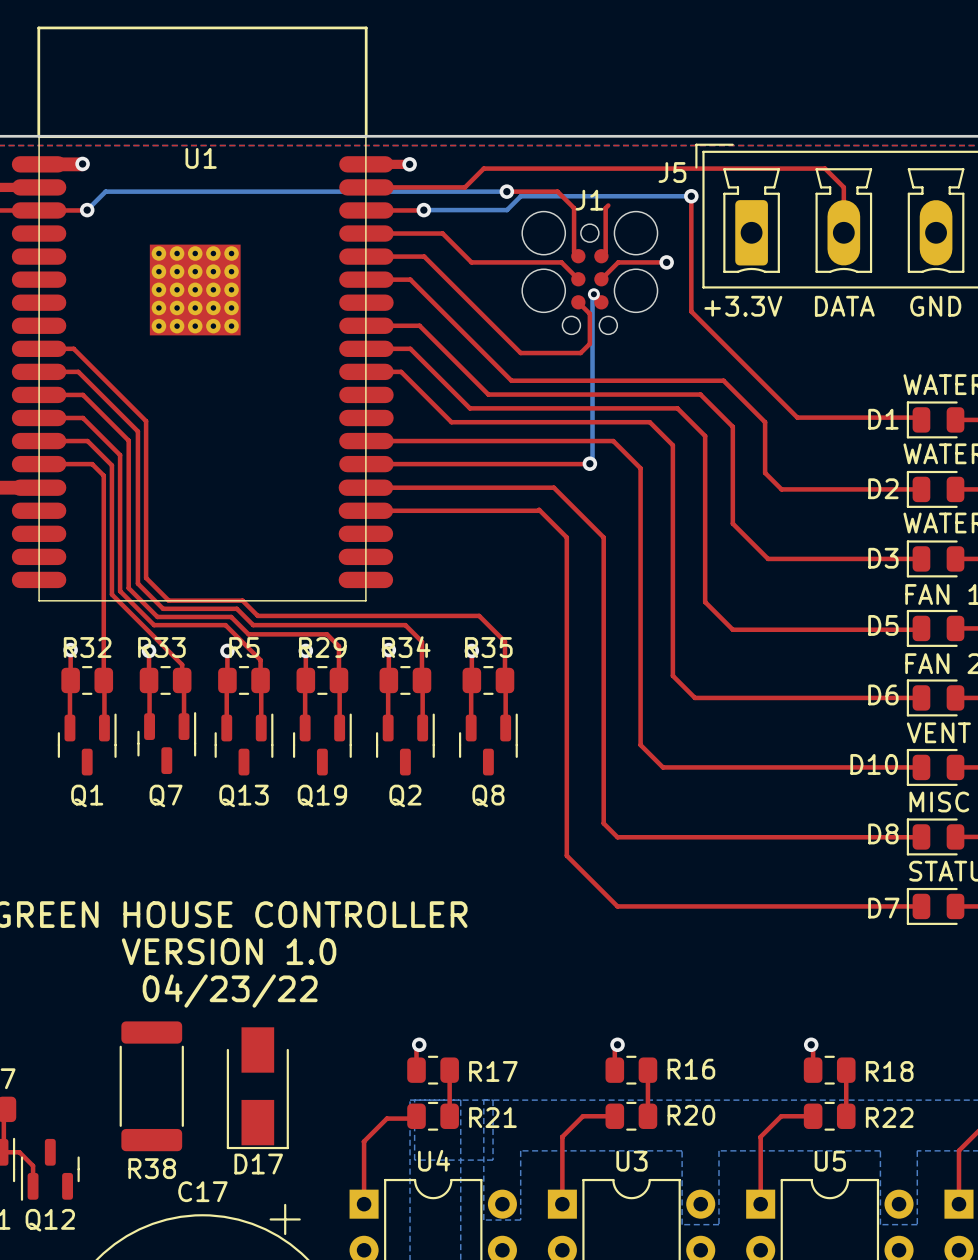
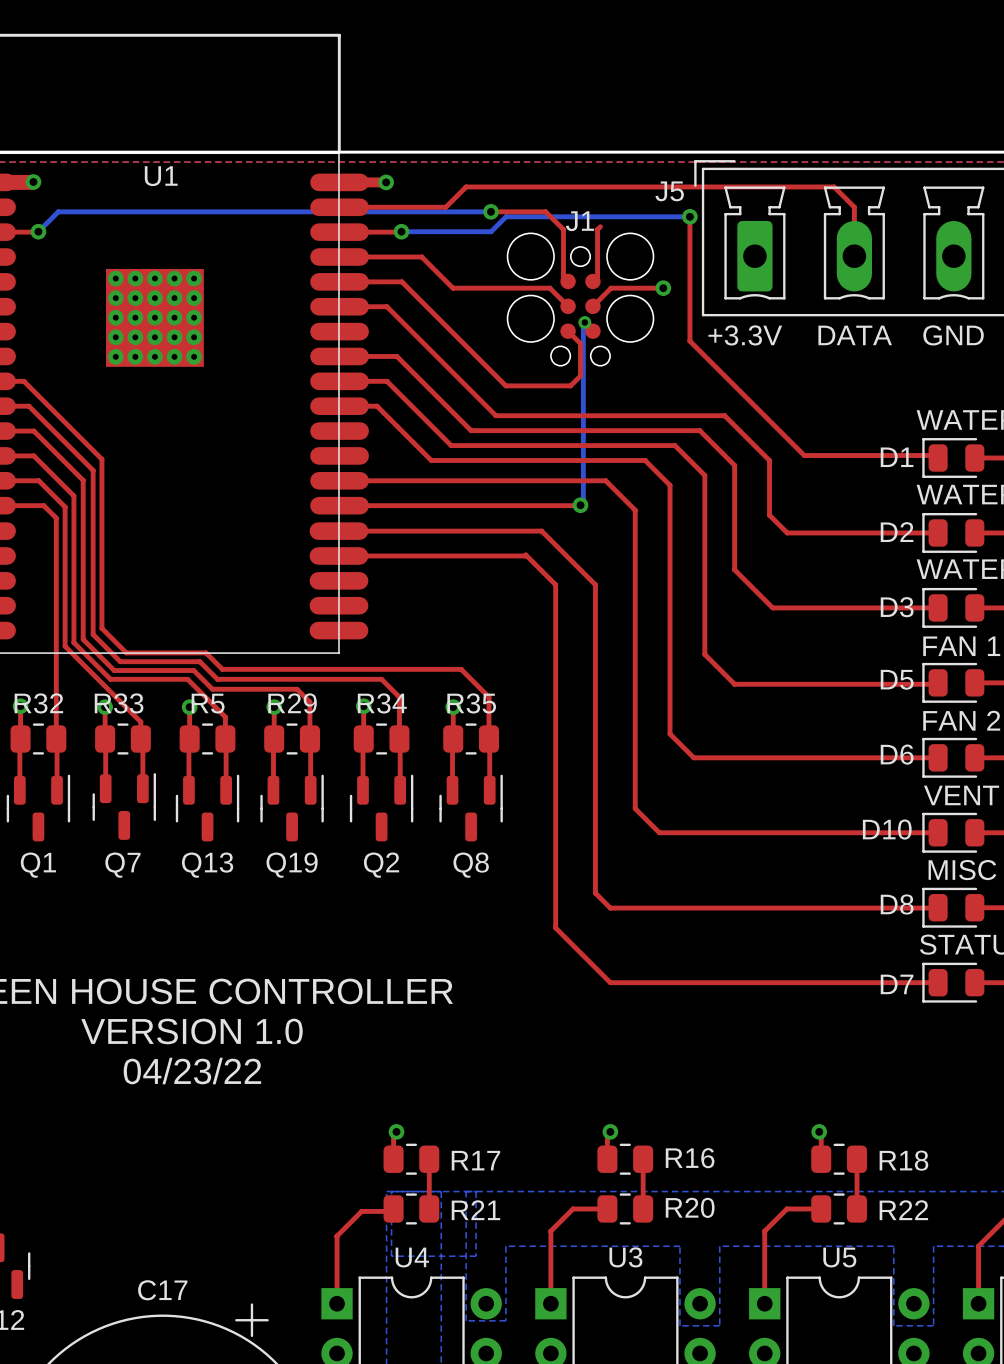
R38: (151, 1086) -> none
D17: (257, 1088) -> none

